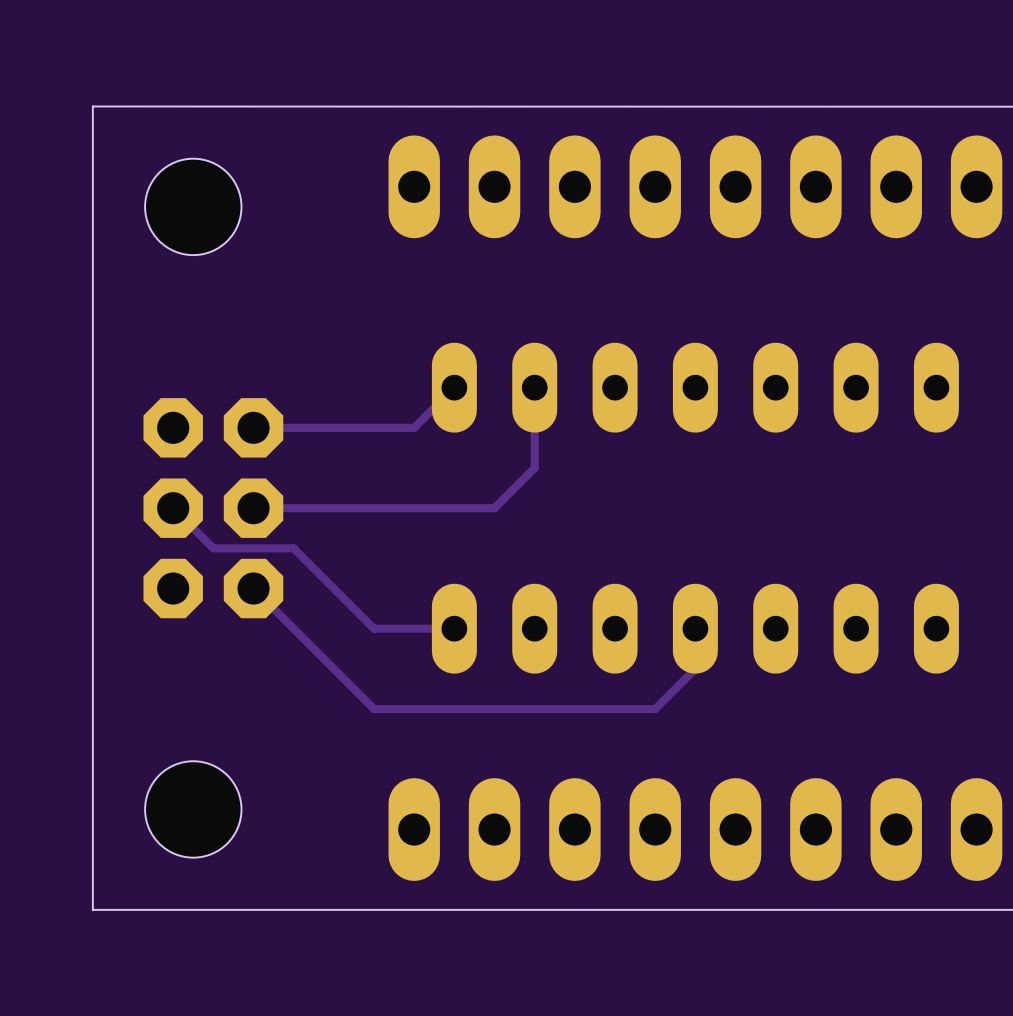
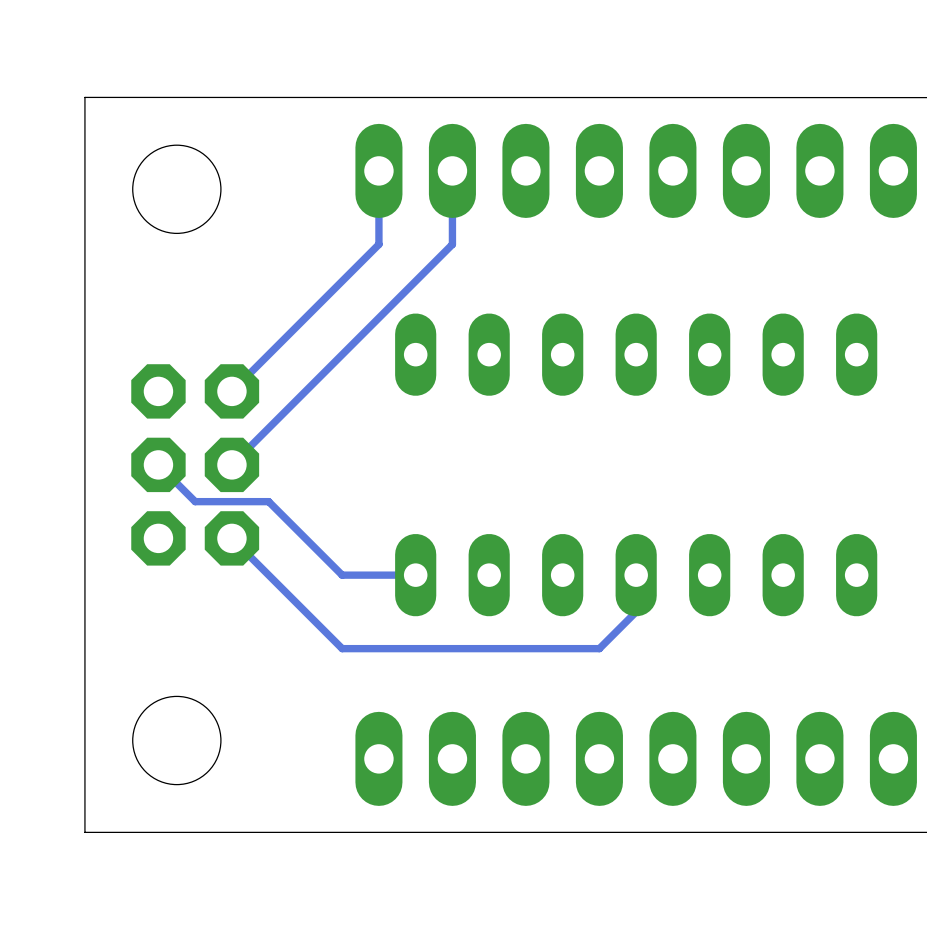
track: (454, 387) (414, 427) (253, 427) -> (378, 170) (378, 244) (231, 391)
track: (534, 387) (534, 468) (494, 508) (253, 508) -> (452, 170) (452, 244) (231, 464)

